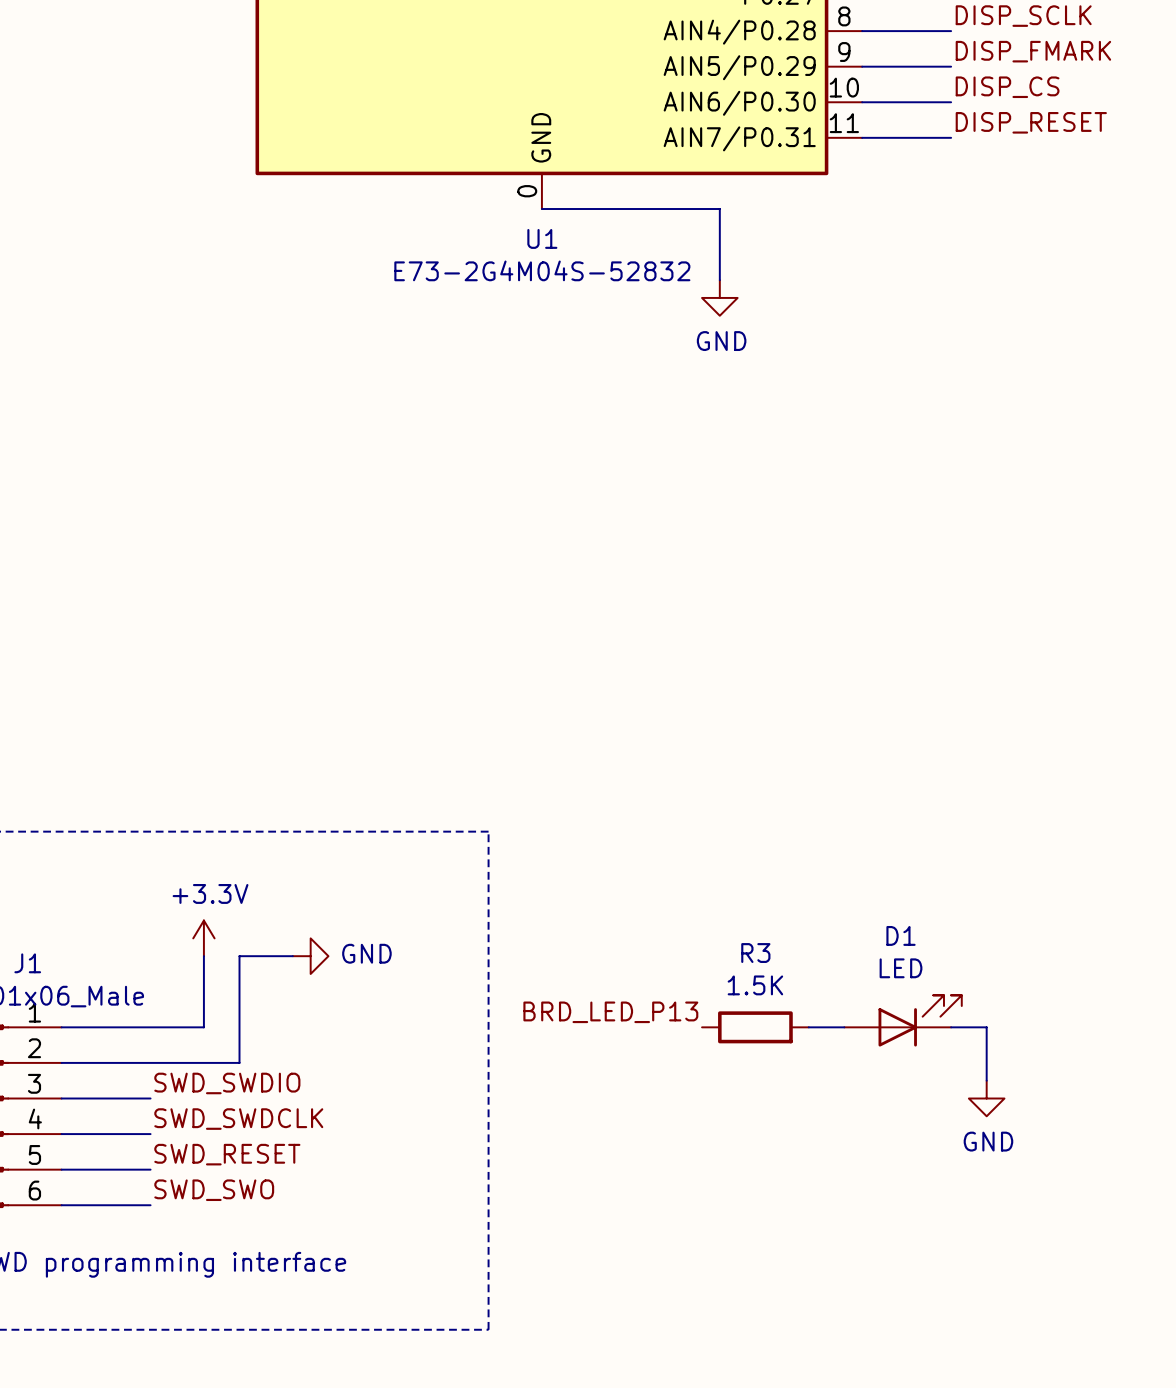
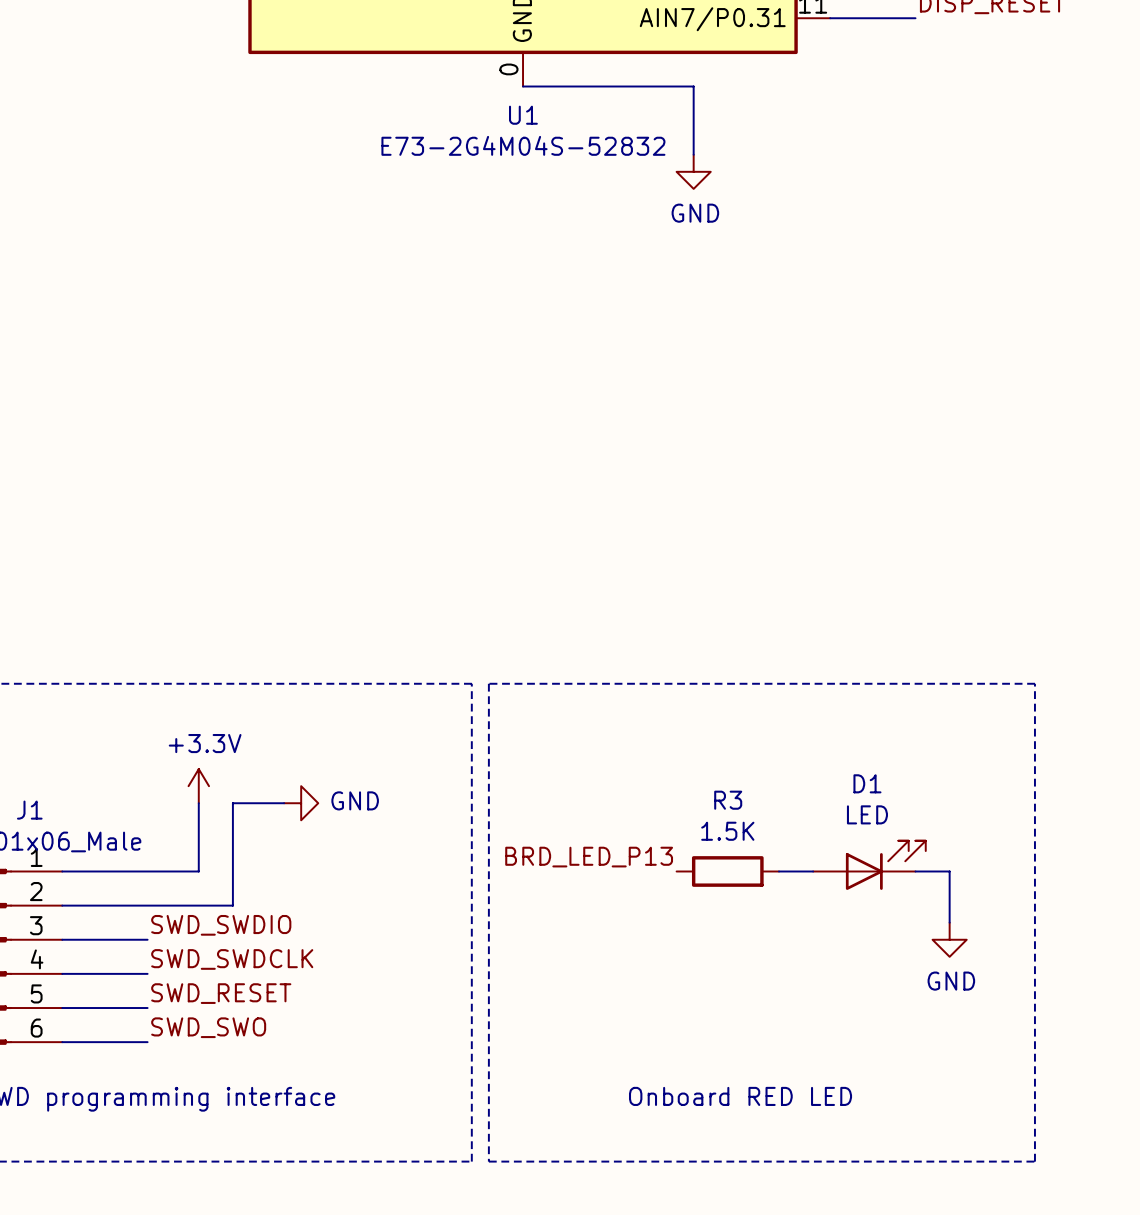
line: none -> (488, 683) (488, 1161) (1034, 1161) (1034, 683) (488, 683)
text: none -> Onboard RED LED (740, 1096)

